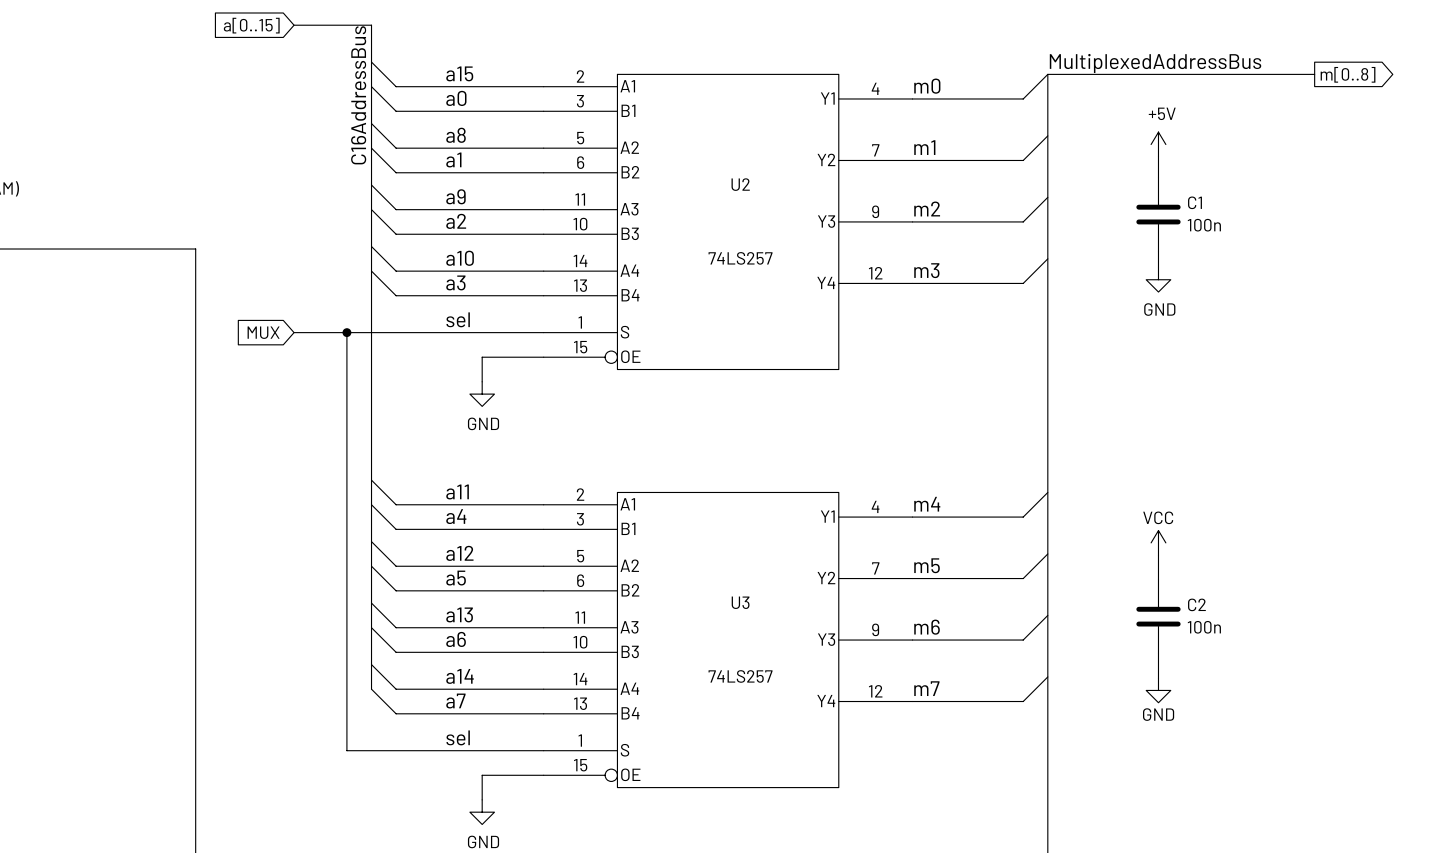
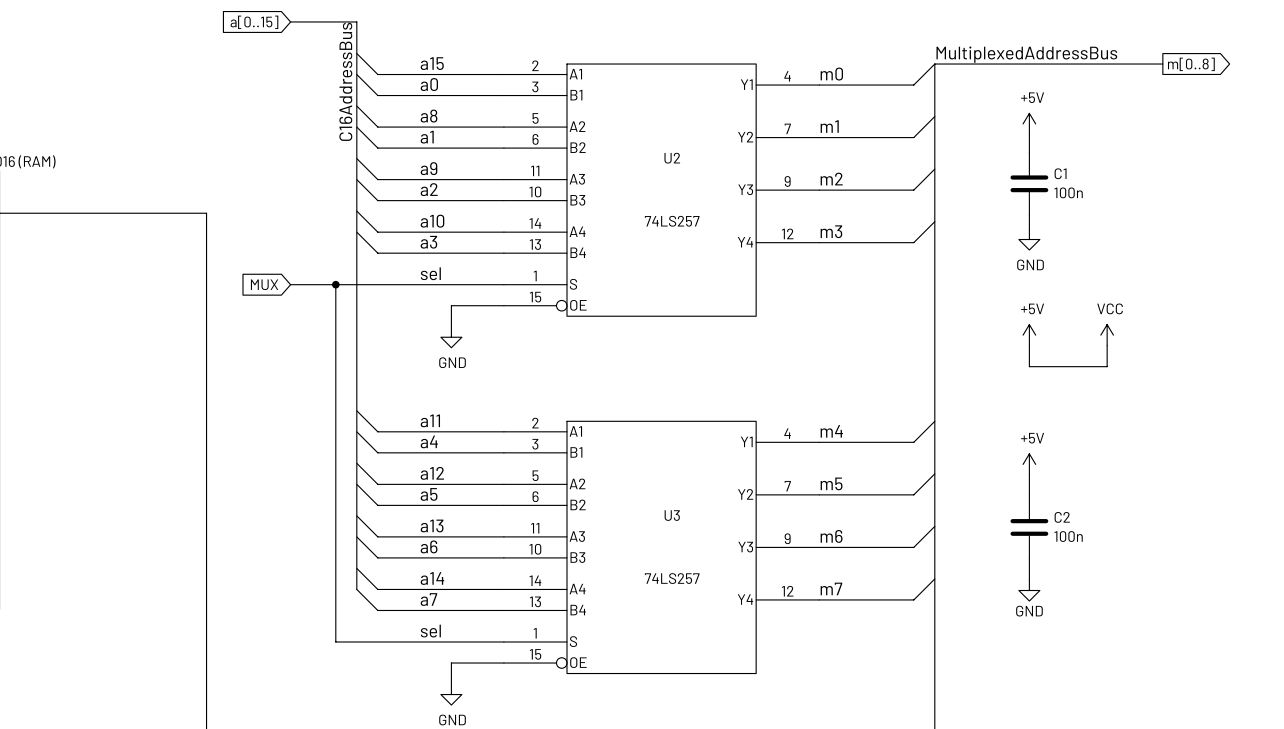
power symbol: none -> +5V (1029, 335)
power symbol: none -> VCC (1107, 335)
wire: none -> (1029, 345) (1029, 366) (1107, 366) (1107, 345)
power symbol: VCC (1158, 542) -> +5V (1029, 464)

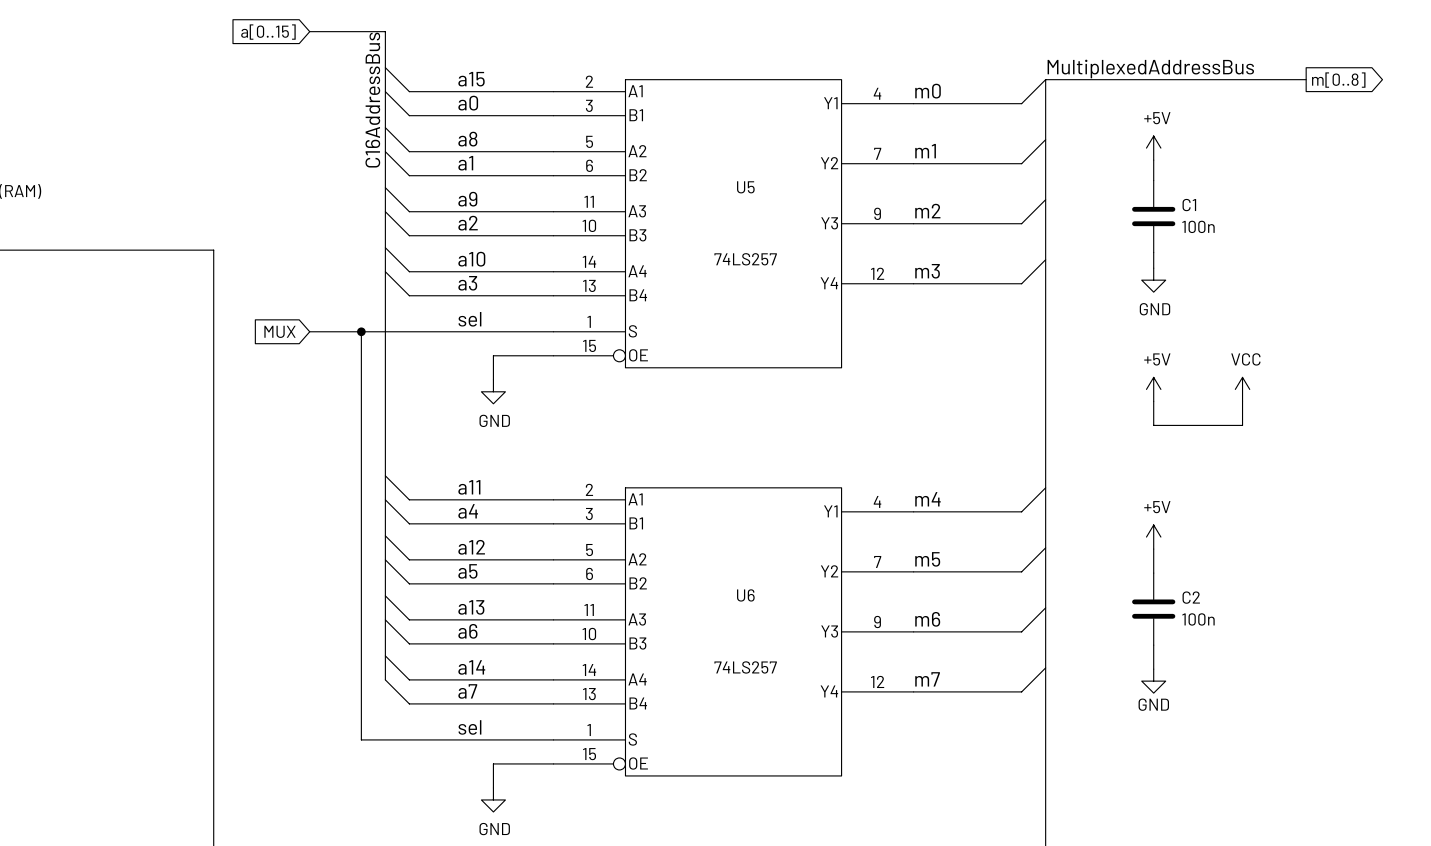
U2 name: U2 (672, 158) -> U5 (745, 187)
U3 name: U3 (672, 515) -> U6 (745, 595)

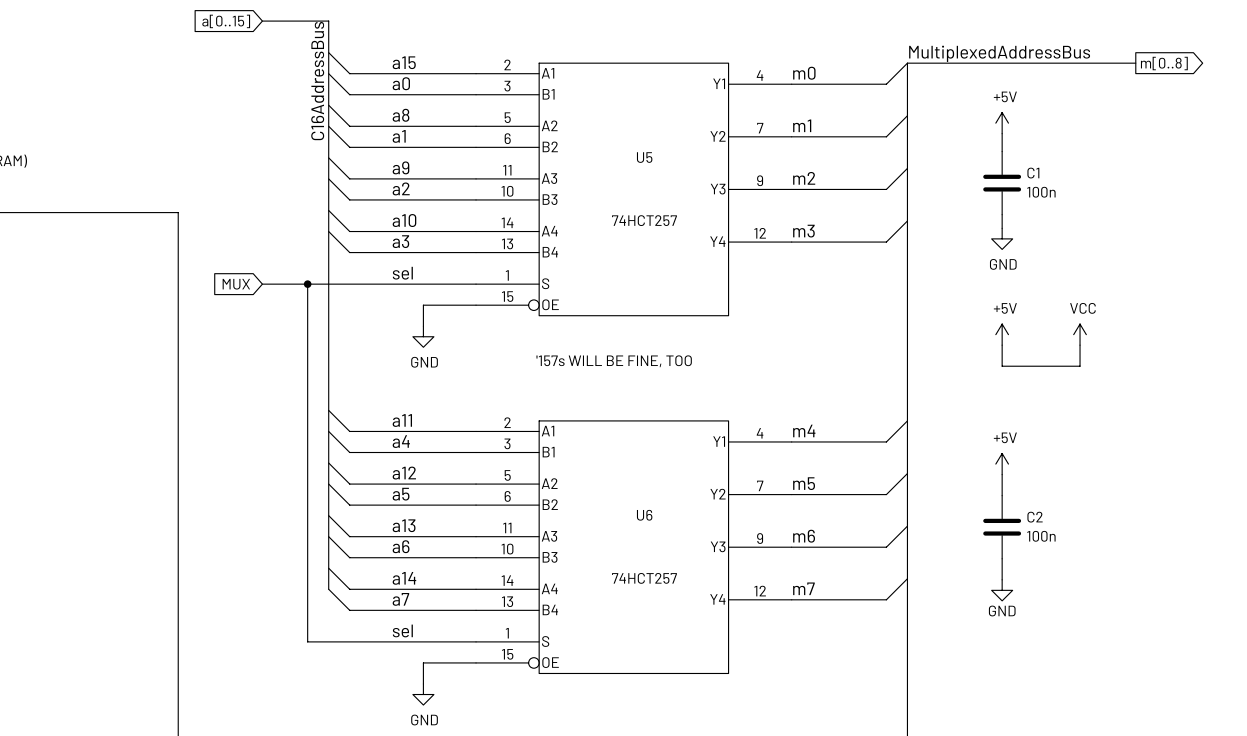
U5 value: 74LS257 (745, 259) -> 74HCT257 (644, 220)
text: none -> '157s WILL BE FINE, TOO (614, 361)
U6 value: 74LS257 (745, 667) -> 74HCT257 (644, 578)

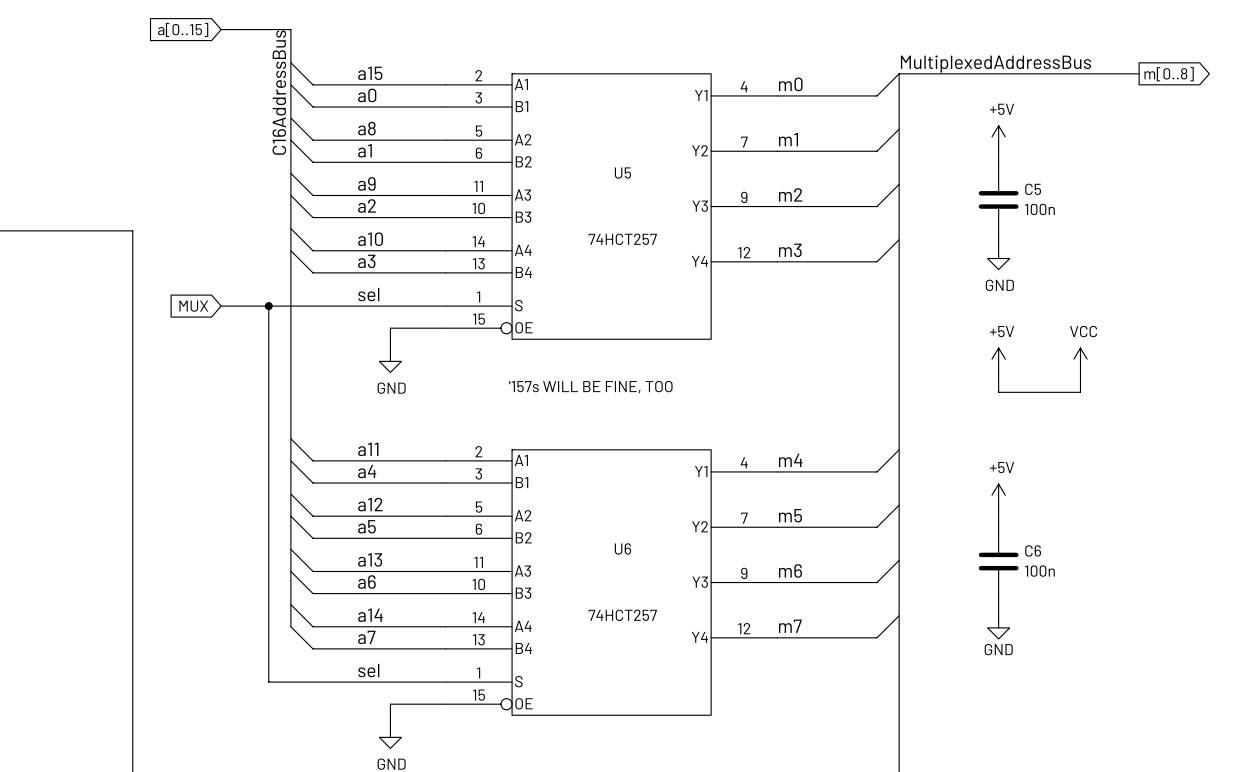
C1 name: C1 (1033, 173) -> C5 (1033, 189)
C2 name: C2 (1035, 517) -> C6 (1033, 550)

